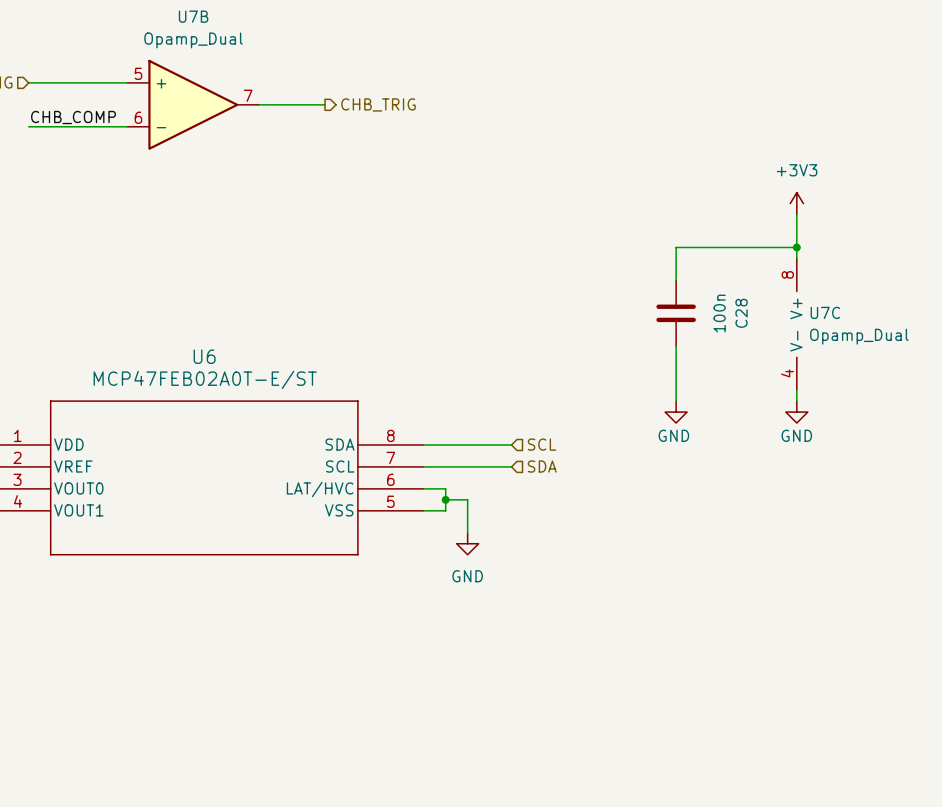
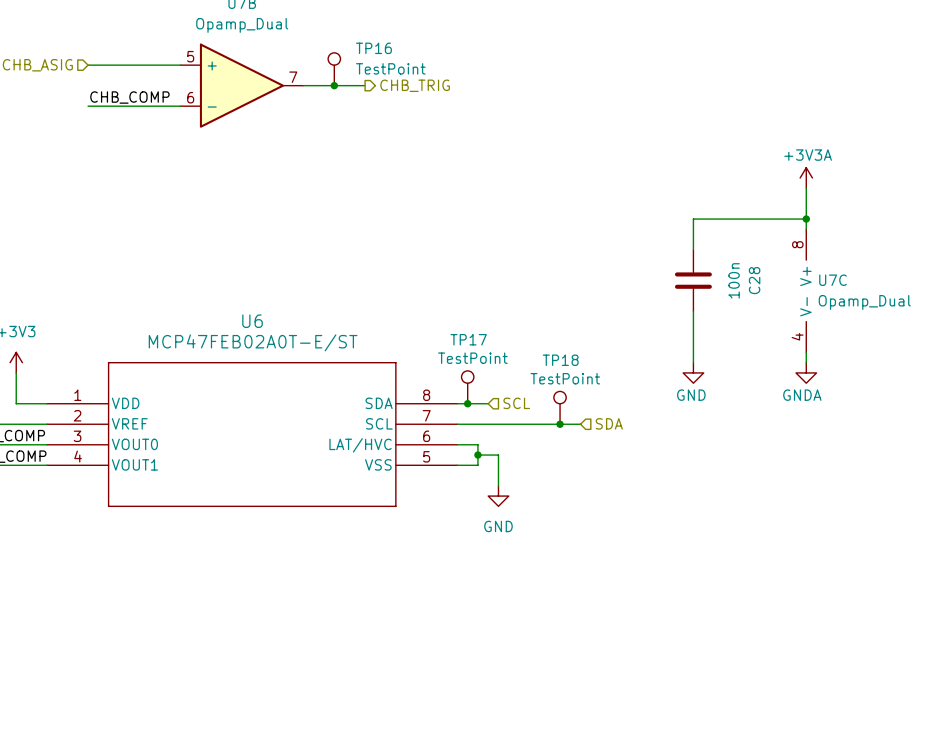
TP16: none -> TestPoint (334, 69)
junction: none -> (334, 85)
power symbol: +3V3 (796, 203) -> +3V3A (806, 178)
power symbol: GND (796, 412) -> GNDA (806, 372)
TP17: none -> TestPoint (467, 387)
junction: none -> (467, 403)
wire: (456, 444) (511, 444) -> none
hierarchical label position: SCL (542, 444) -> SCL (516, 403)
TP18: none -> TestPoint (560, 407)
wire: none -> (539, 424) (580, 424)
junction: none -> (560, 424)
hierarchical label position: SDA (542, 466) -> SDA (609, 423)

